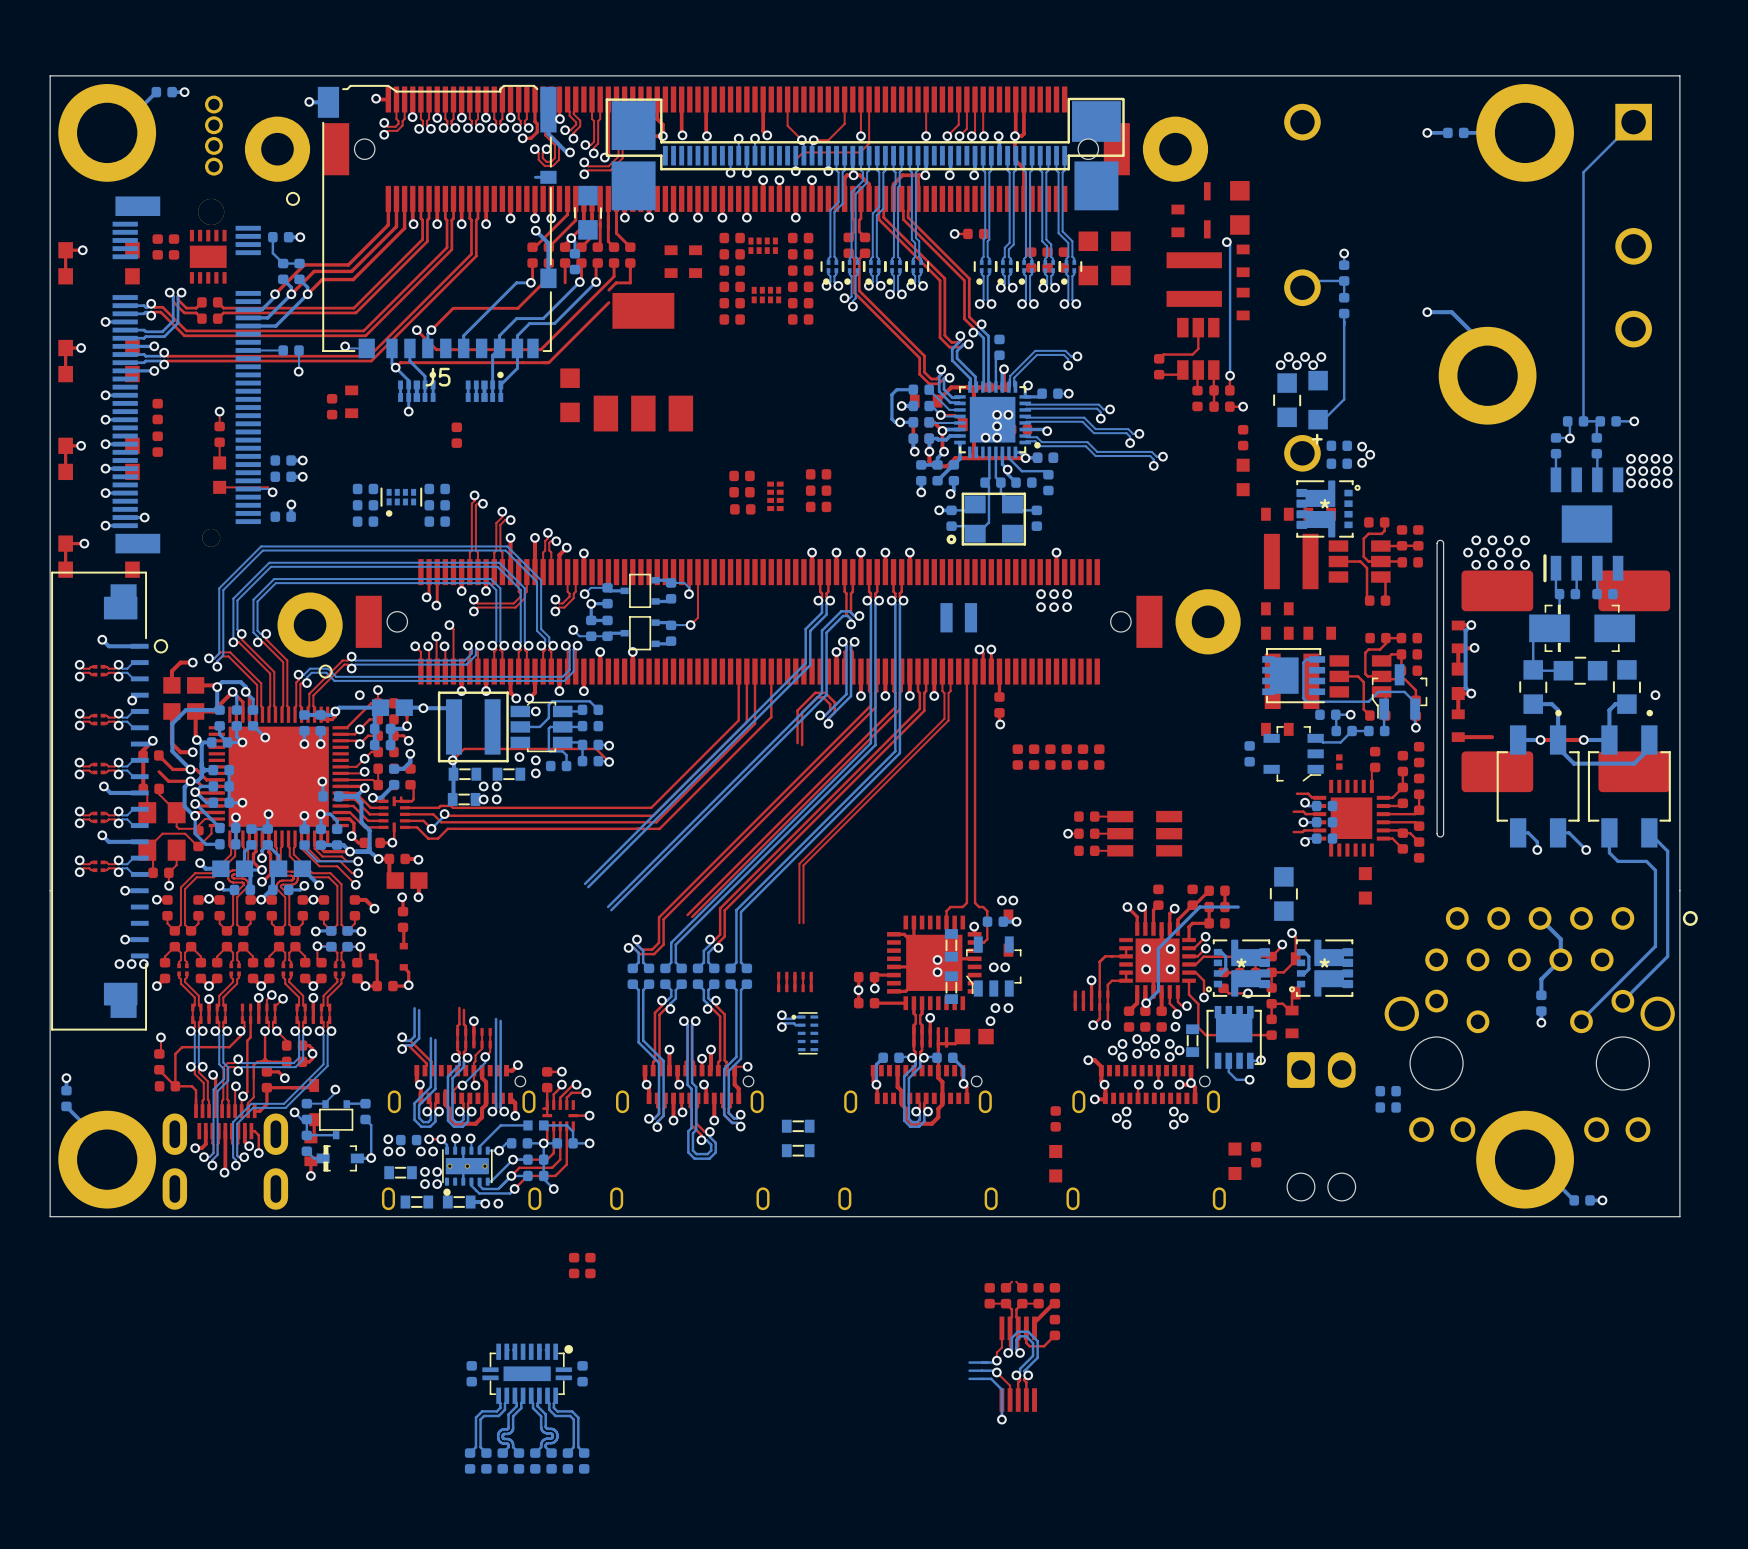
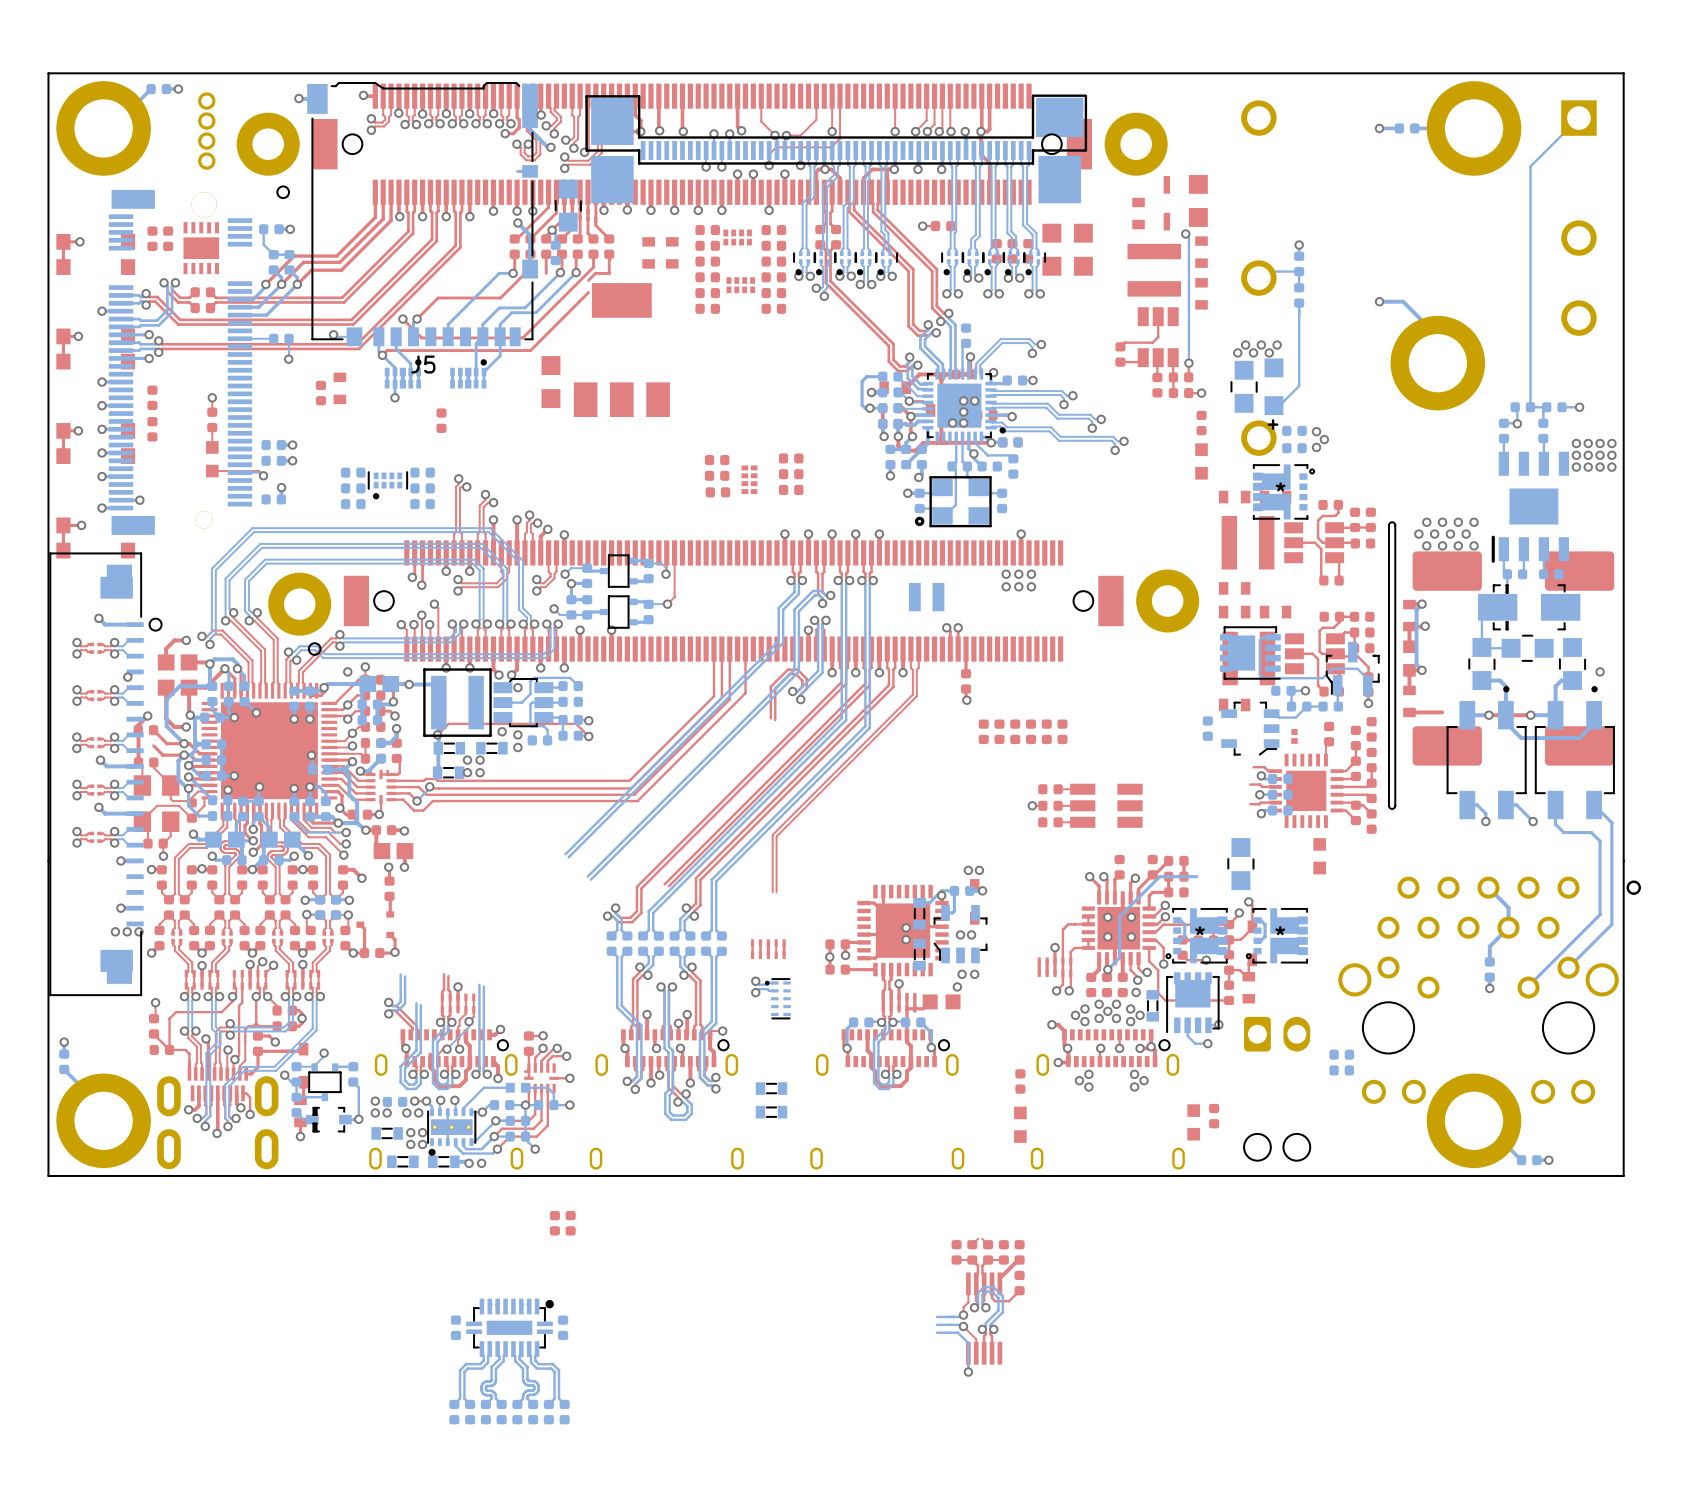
top track: (966, 671) (966, 902) (962, 907) (950, 907) (946, 911) (946, 922) -> none
top track: (975, 671) (975, 902) (987, 911) (987, 939) (984, 942) (974, 942) -> none
bottom track: none -> (919, 902) (929, 902) (941, 890) (954, 890) (954, 911) (945, 912)

